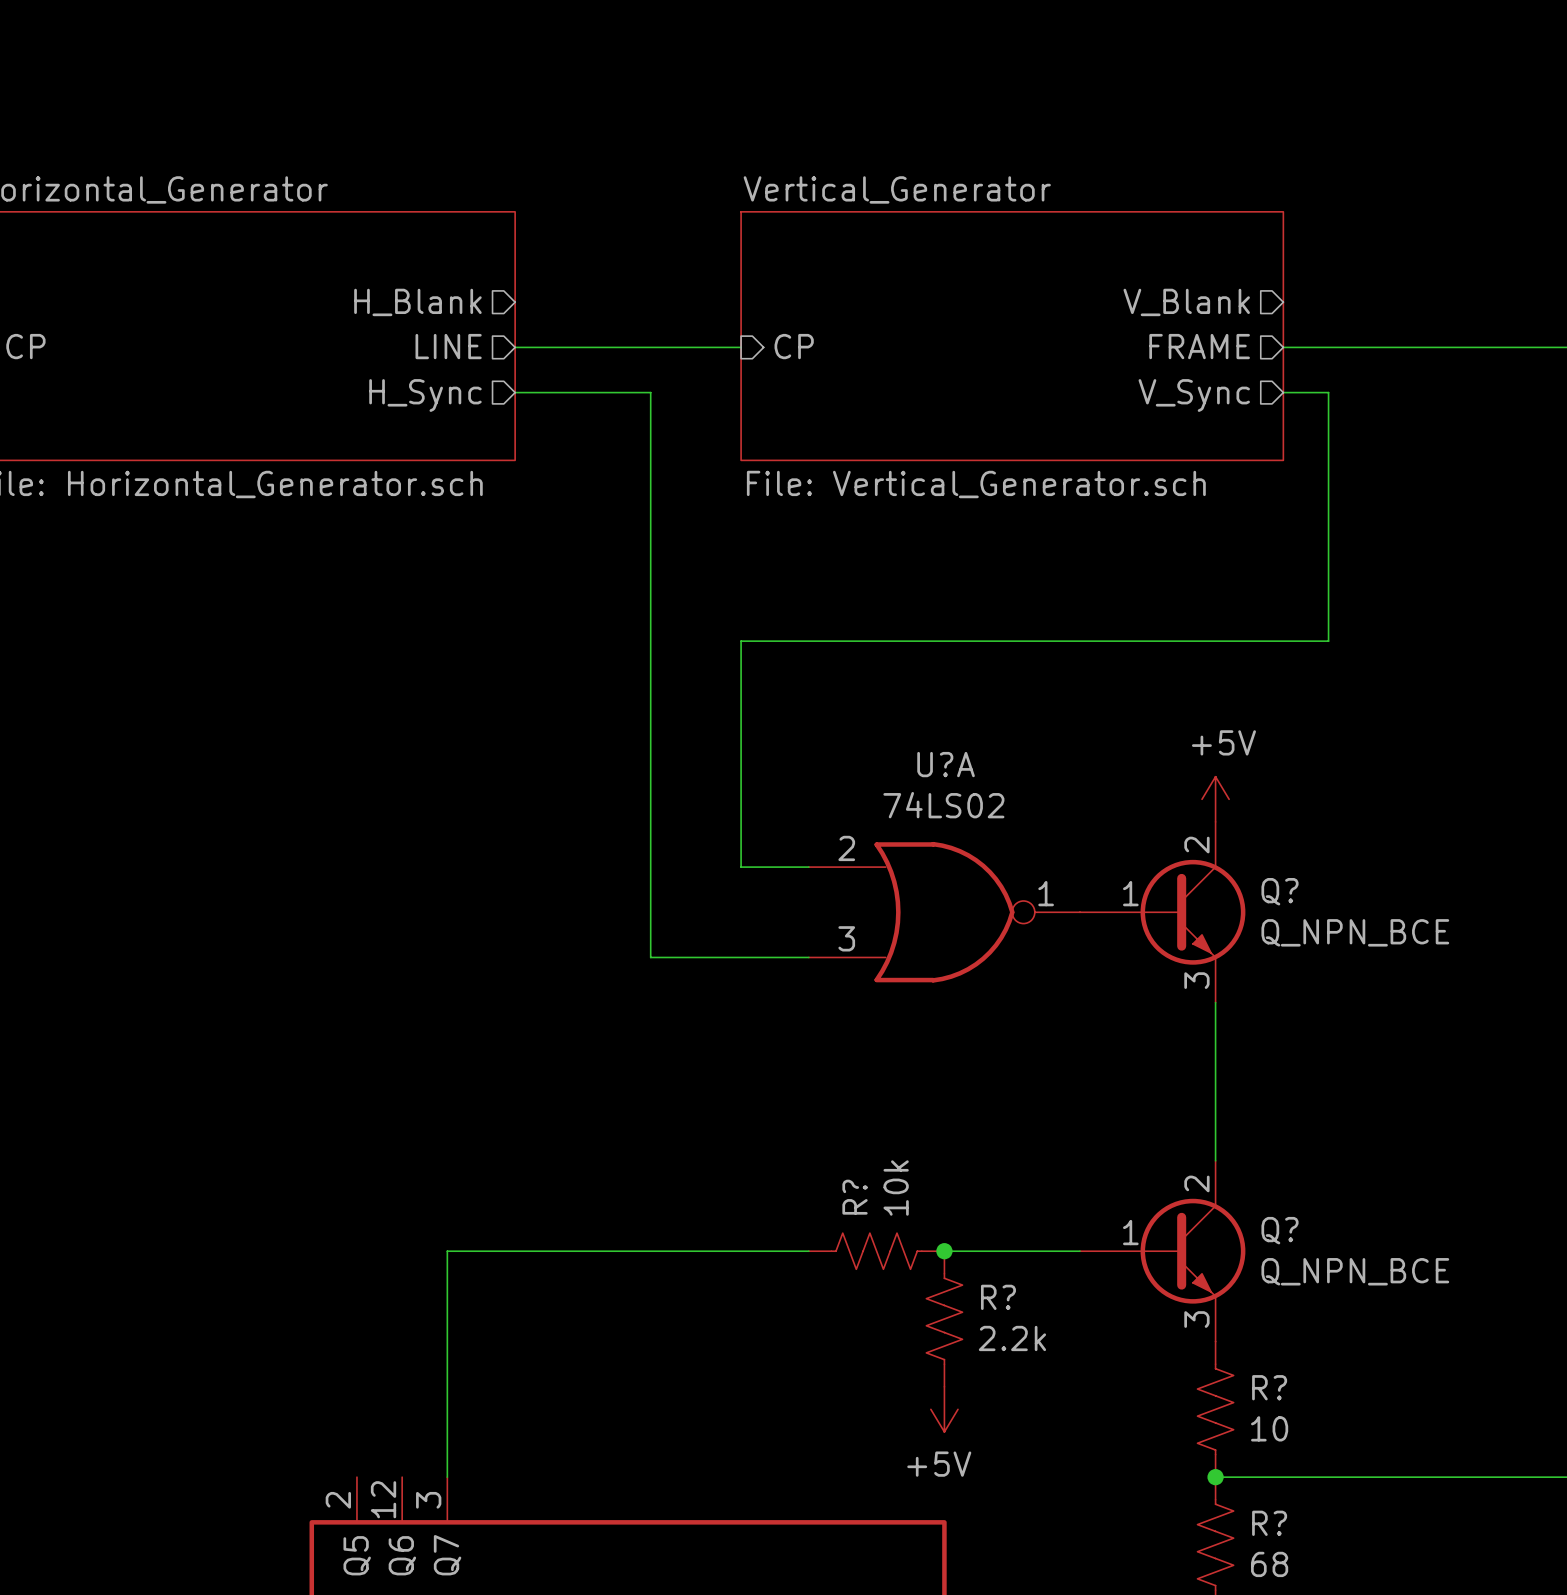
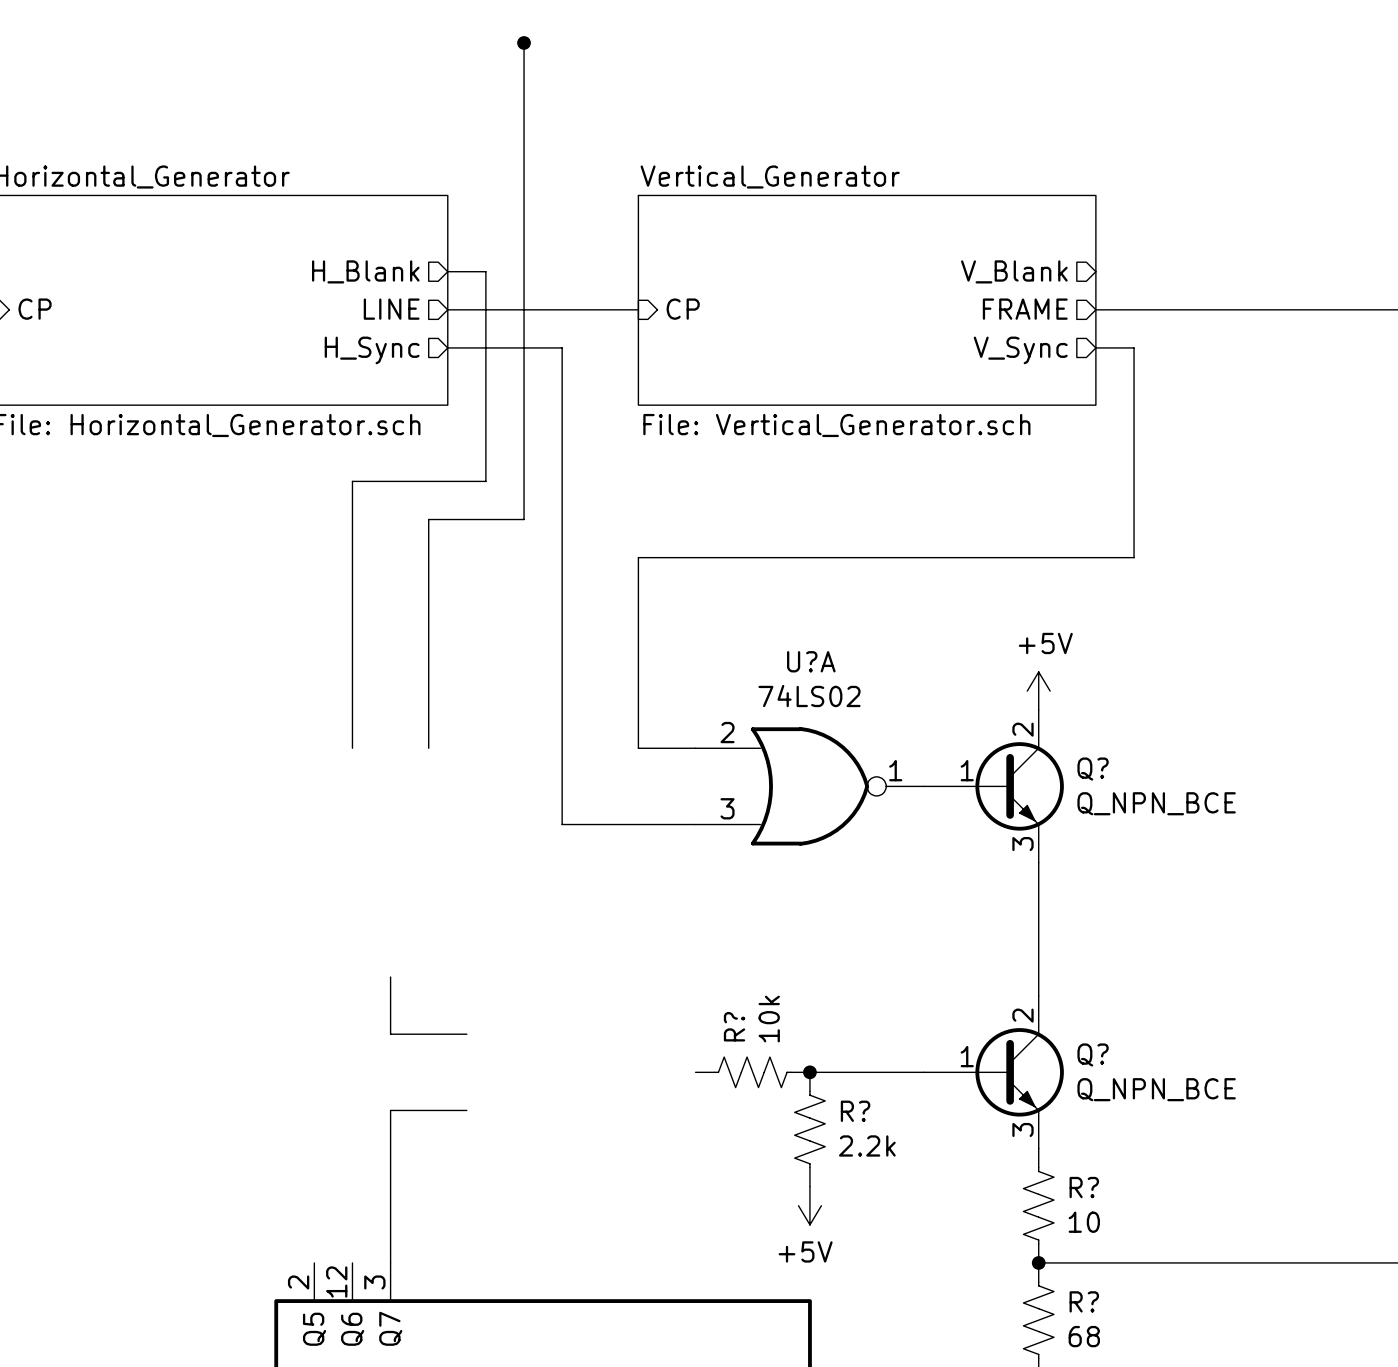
wire: none -> (524, 42) (524, 519) (428, 519) (428, 748)
junction: none -> (524, 42)
wire: none -> (447, 271) (485, 271) (485, 481) (352, 481) (352, 748)
wire: none -> (390, 977) (390, 1034) (466, 1034)
wire: (808, 1251) (447, 1251) (447, 1296) -> (466, 1110) (390, 1110)

